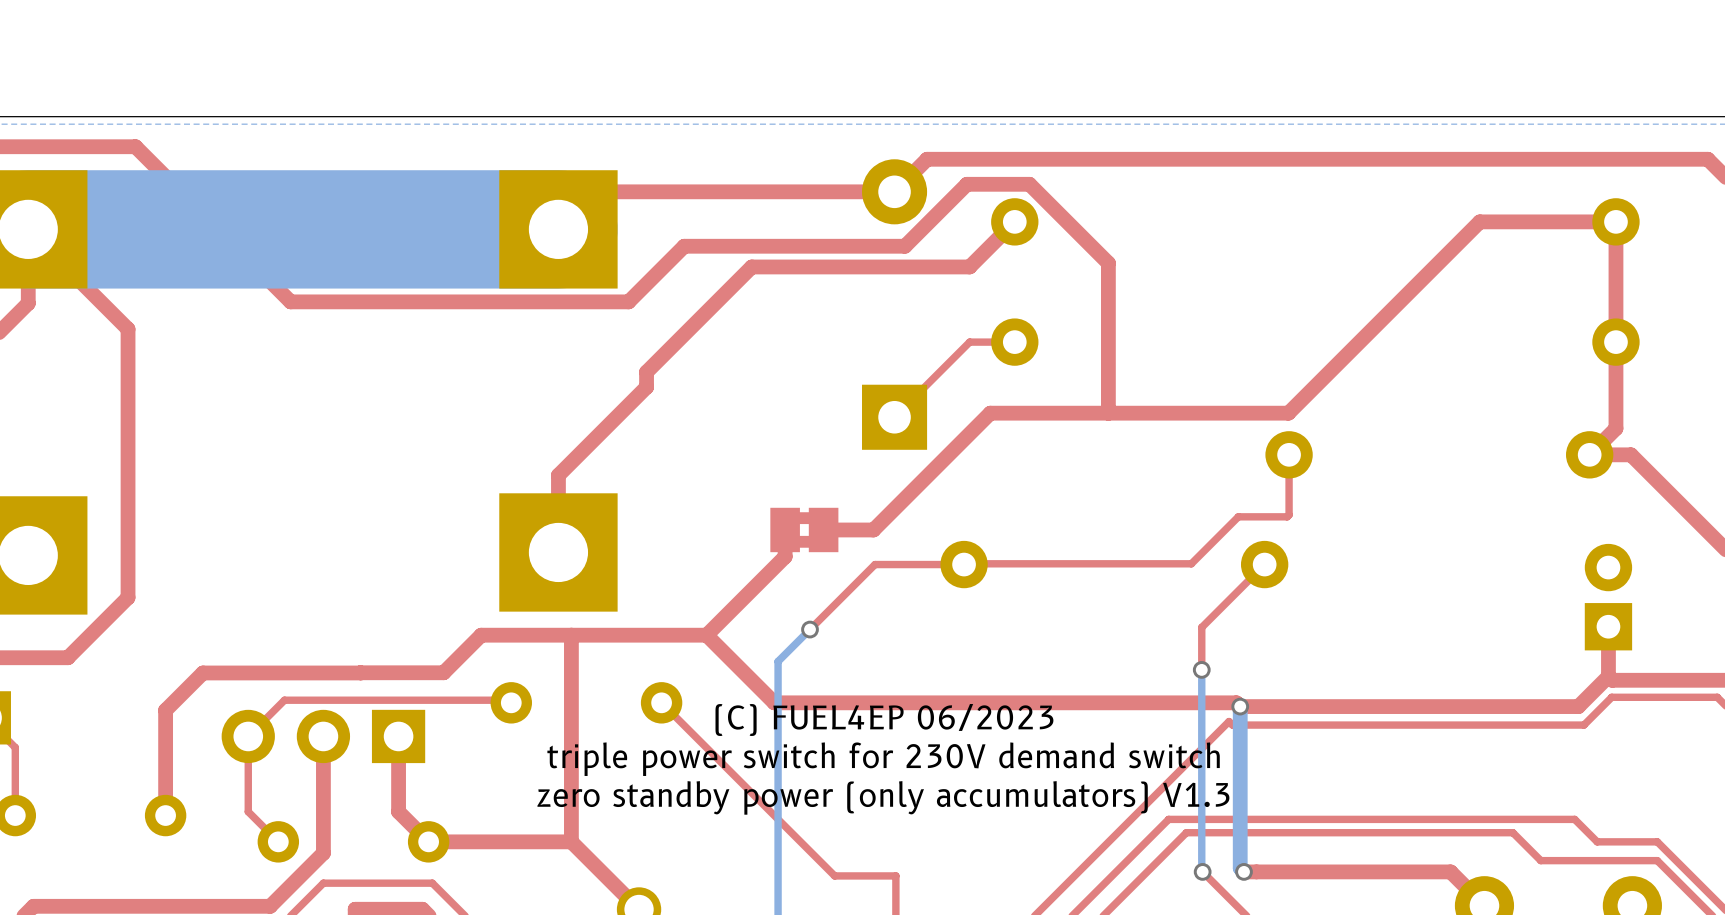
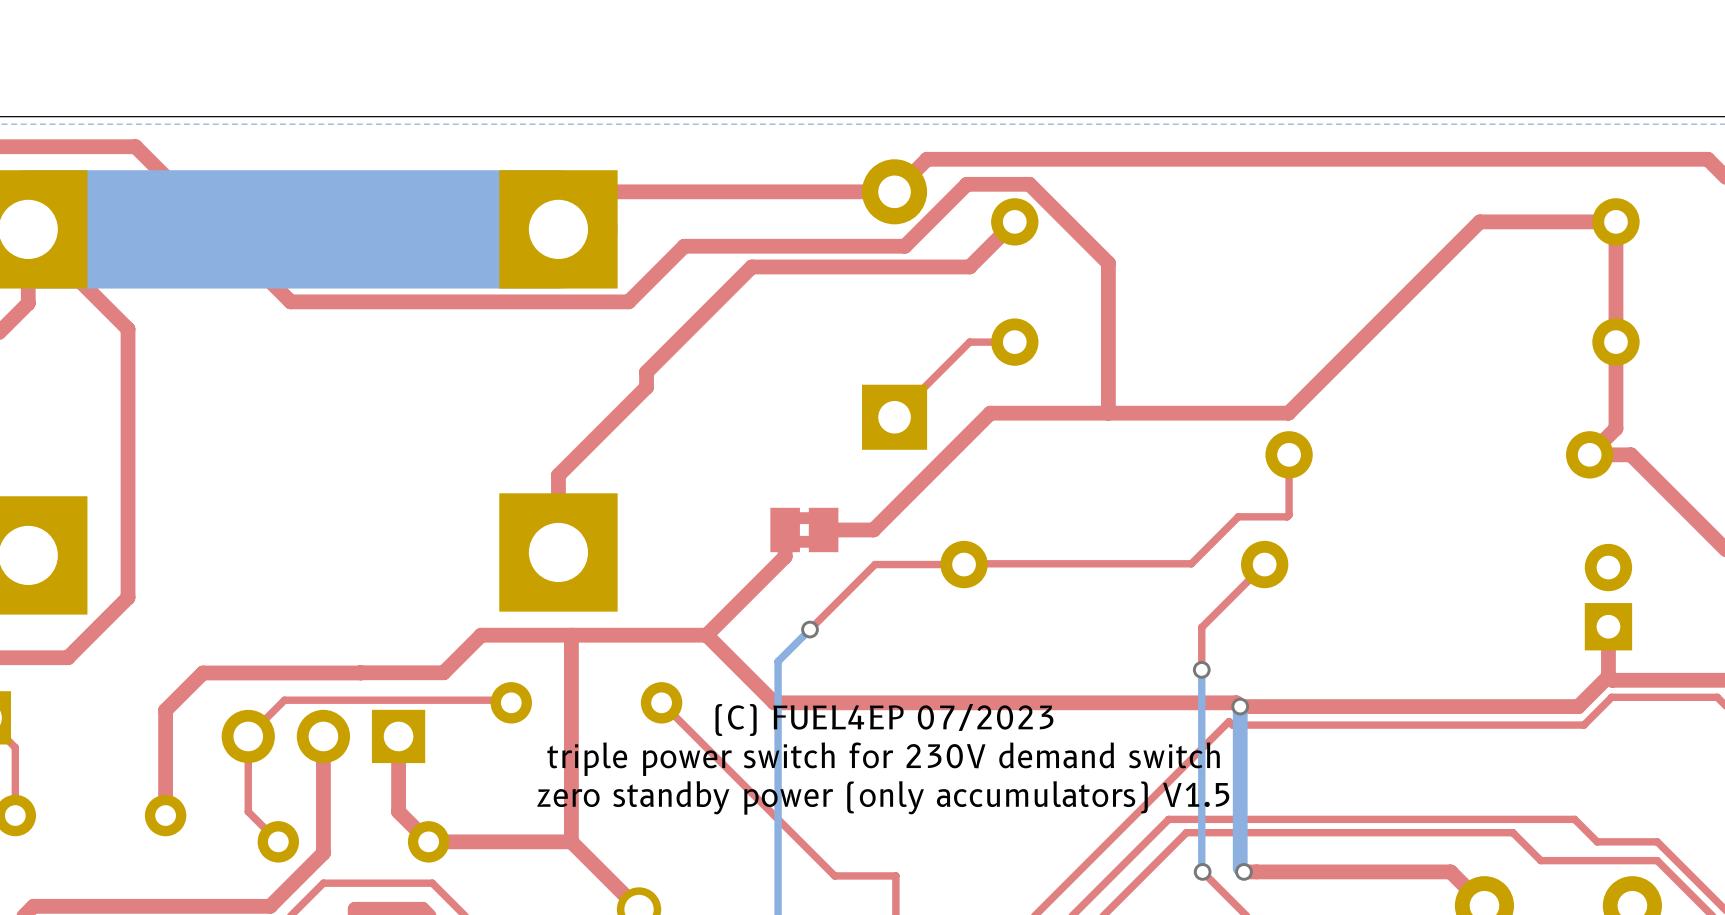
text: (C) FUEL4EP 06/2023 (884, 720) -> (C) FUEL4EP 07/2023 (884, 720)
text: zero standby power (only accumulators) V1.3 (883, 797) -> zero standby power (only accumulators) V1.5 (883, 797)

